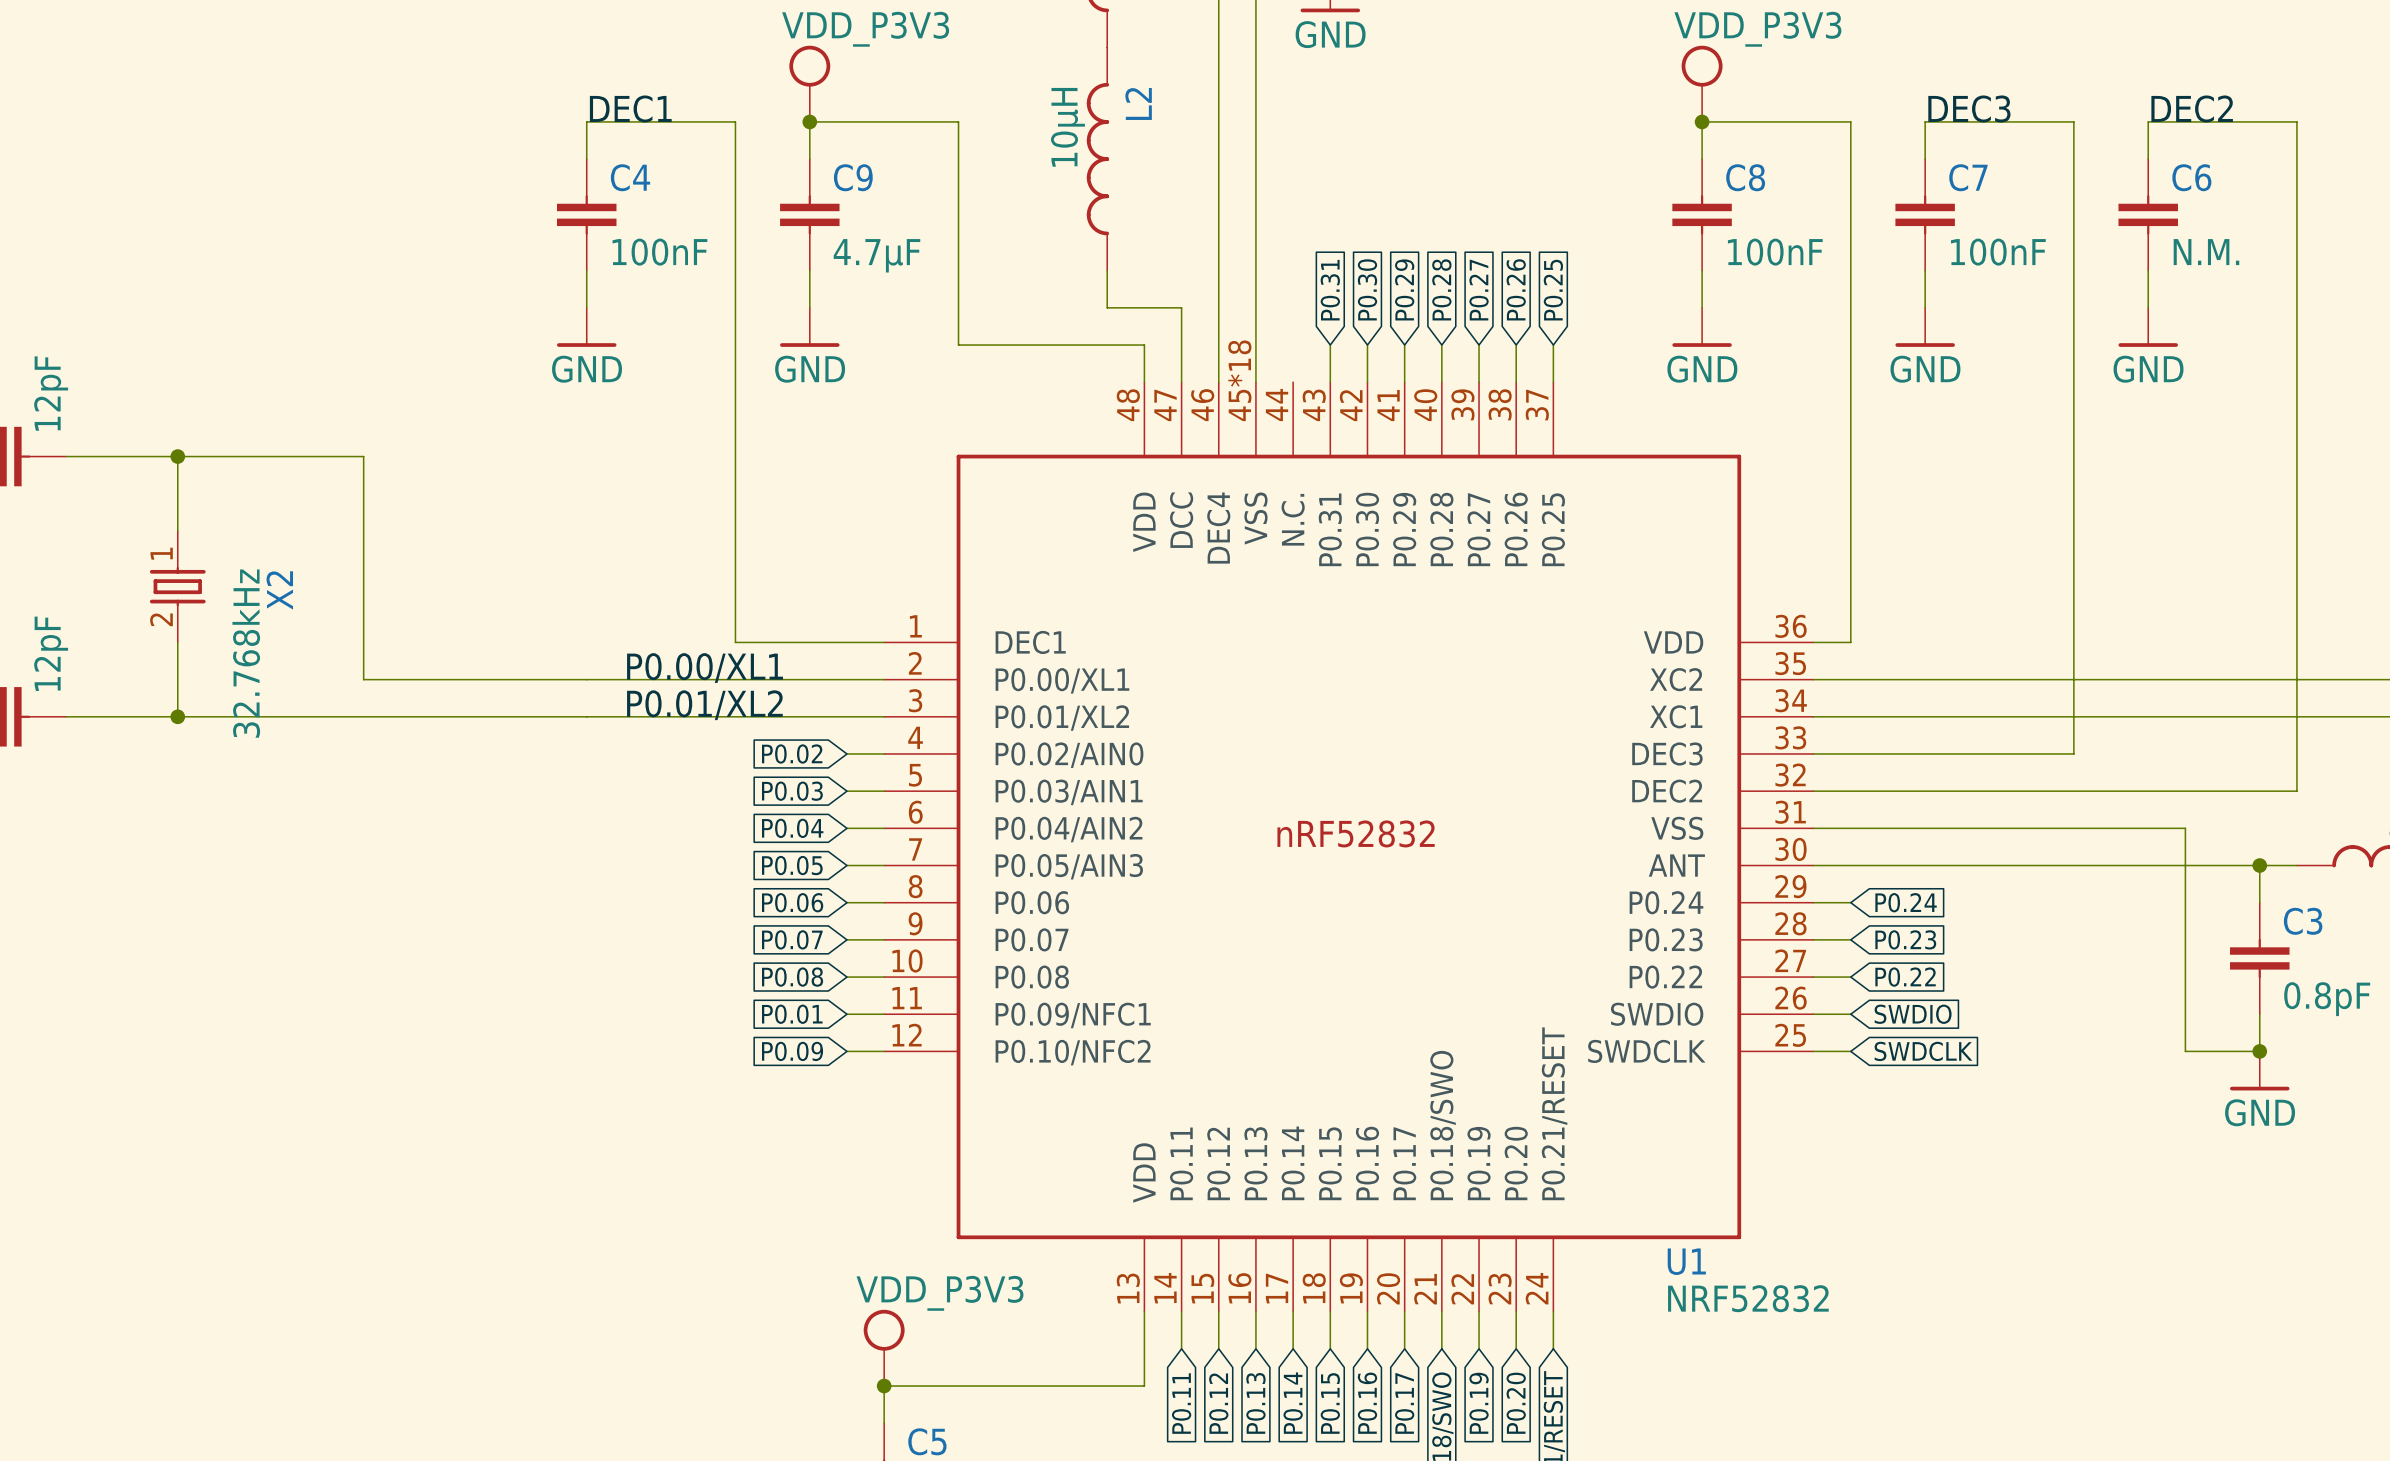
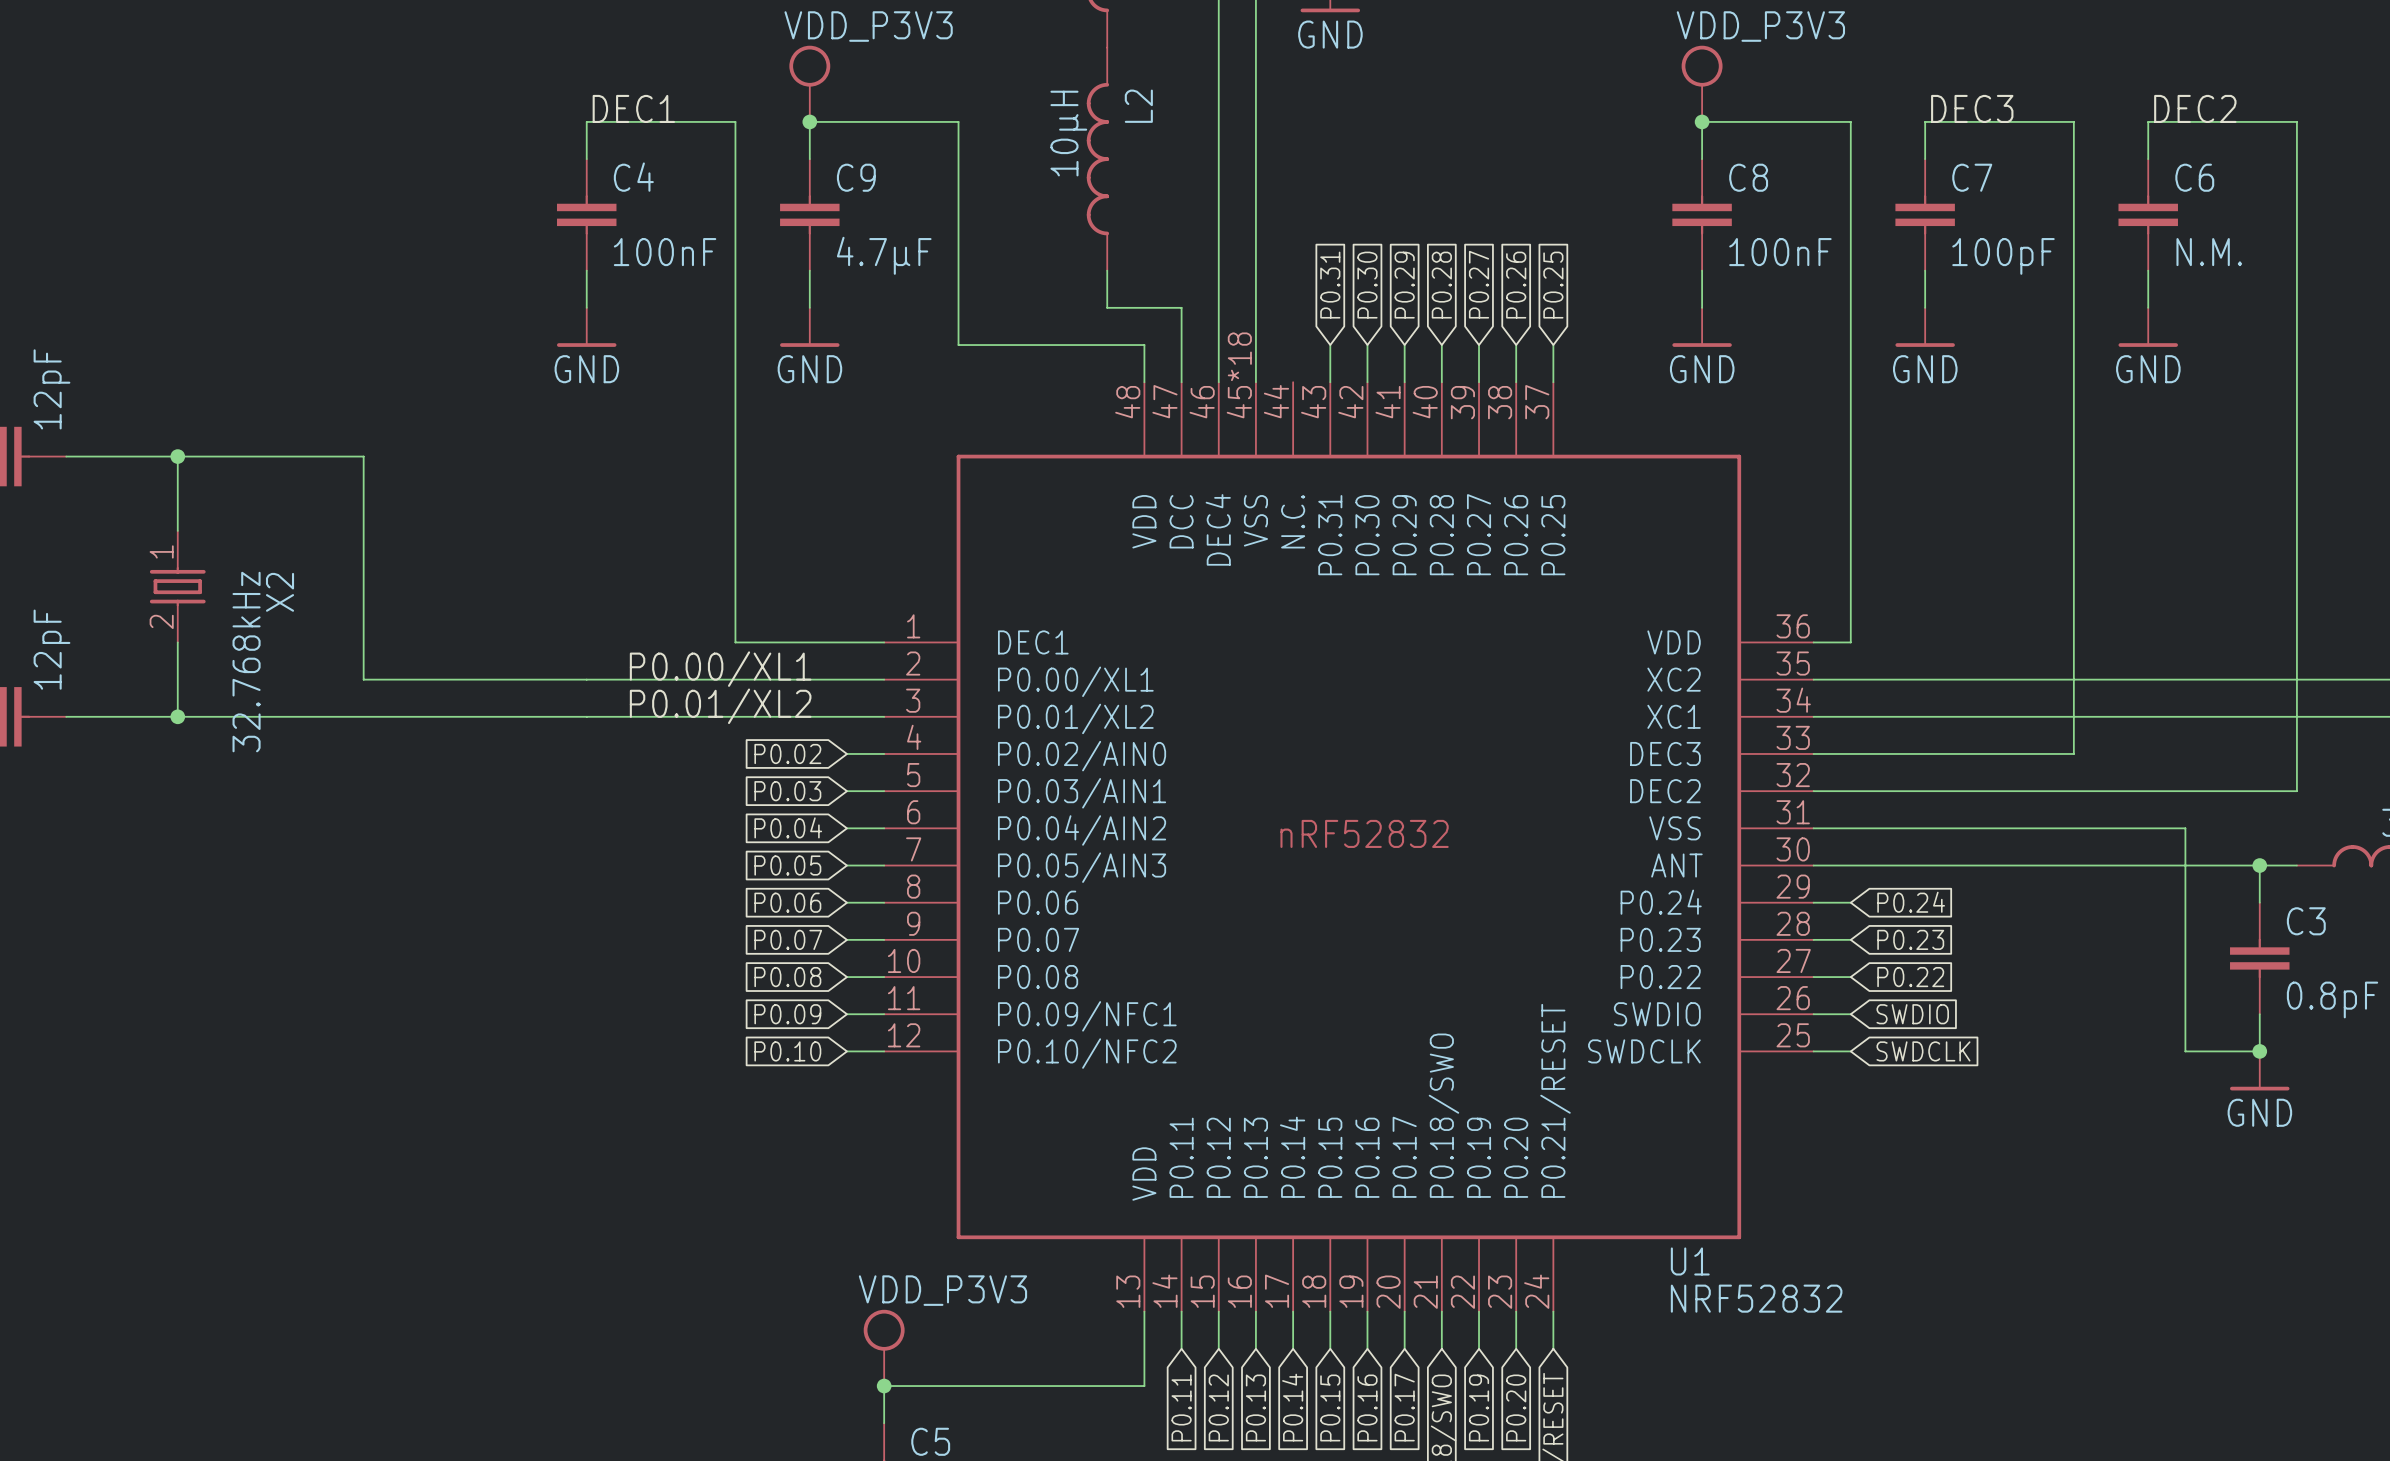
C7 value: 100nF (1998, 252) -> 100pF (2003, 256)
global label: P0.01 (792, 1014) -> P0.09 (787, 1014)
global label: P0.09 (792, 1051) -> P0.10 (787, 1051)

